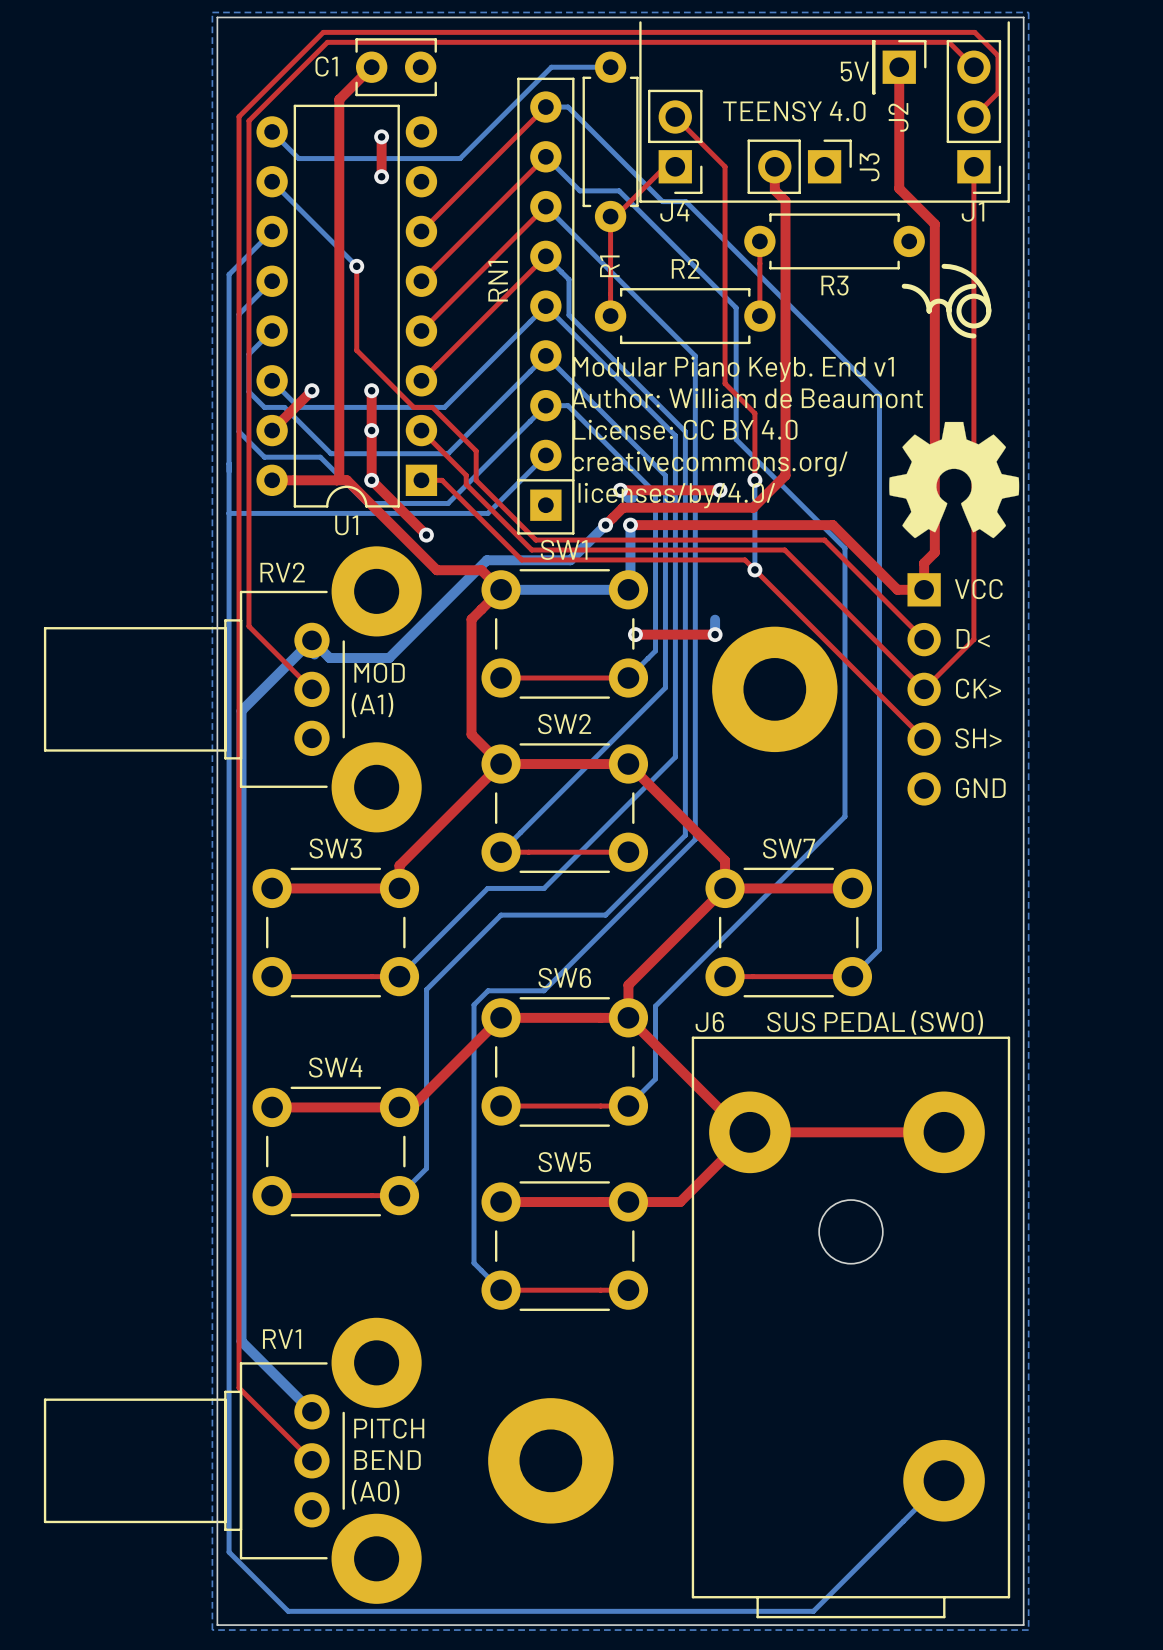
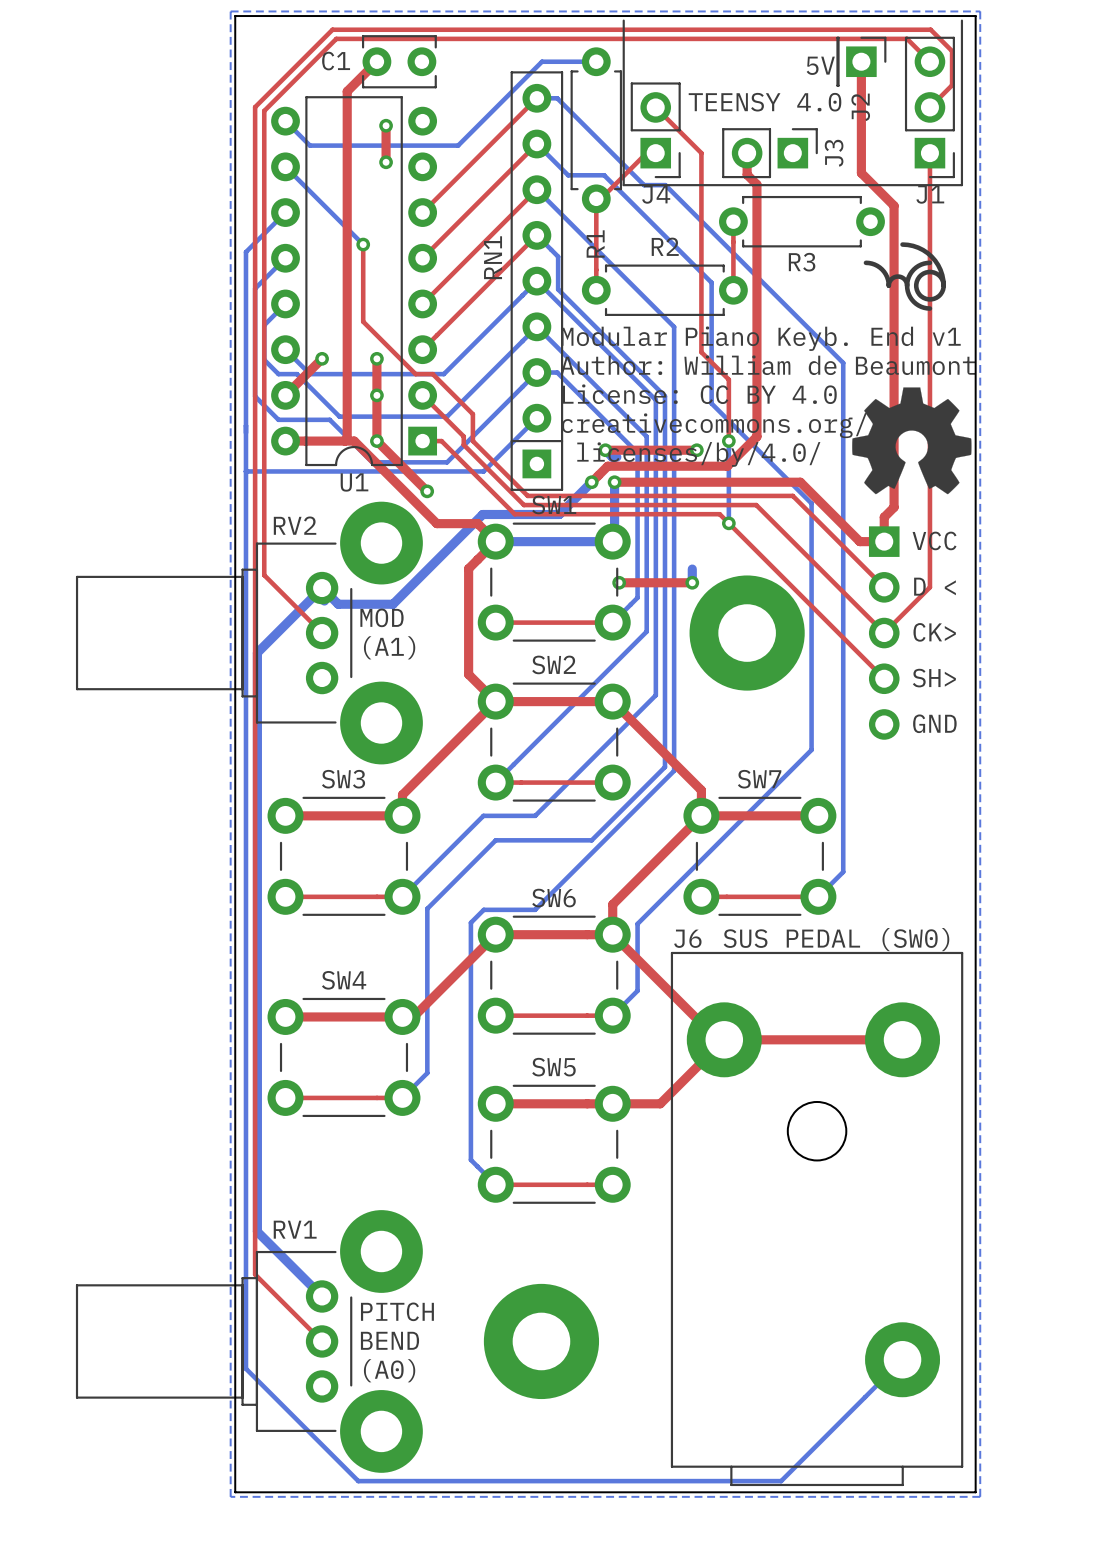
bottom track: (229, 1490) (229, 1552) (288, 1611) (813, 1611) -> (245, 1368) (358, 1481) (782, 1479)

